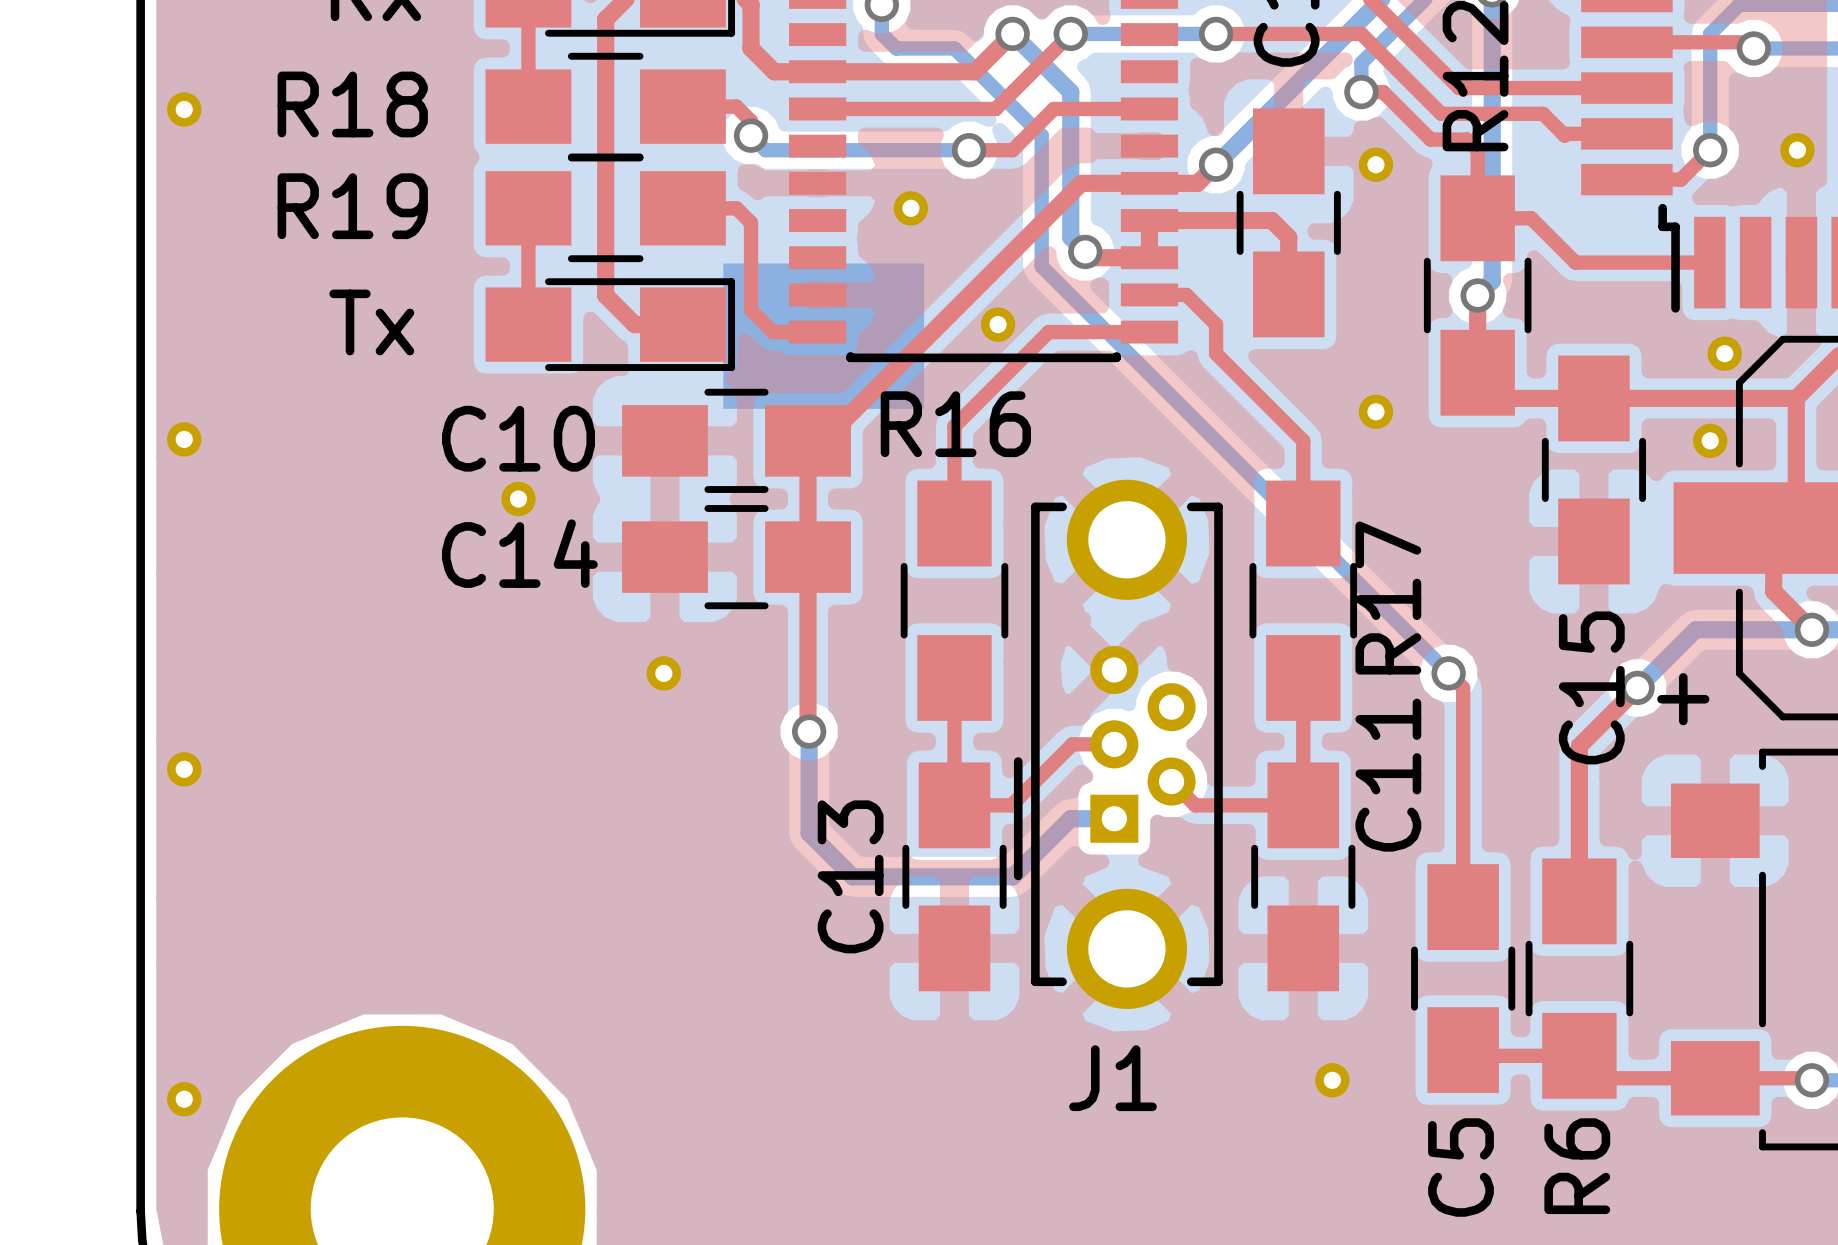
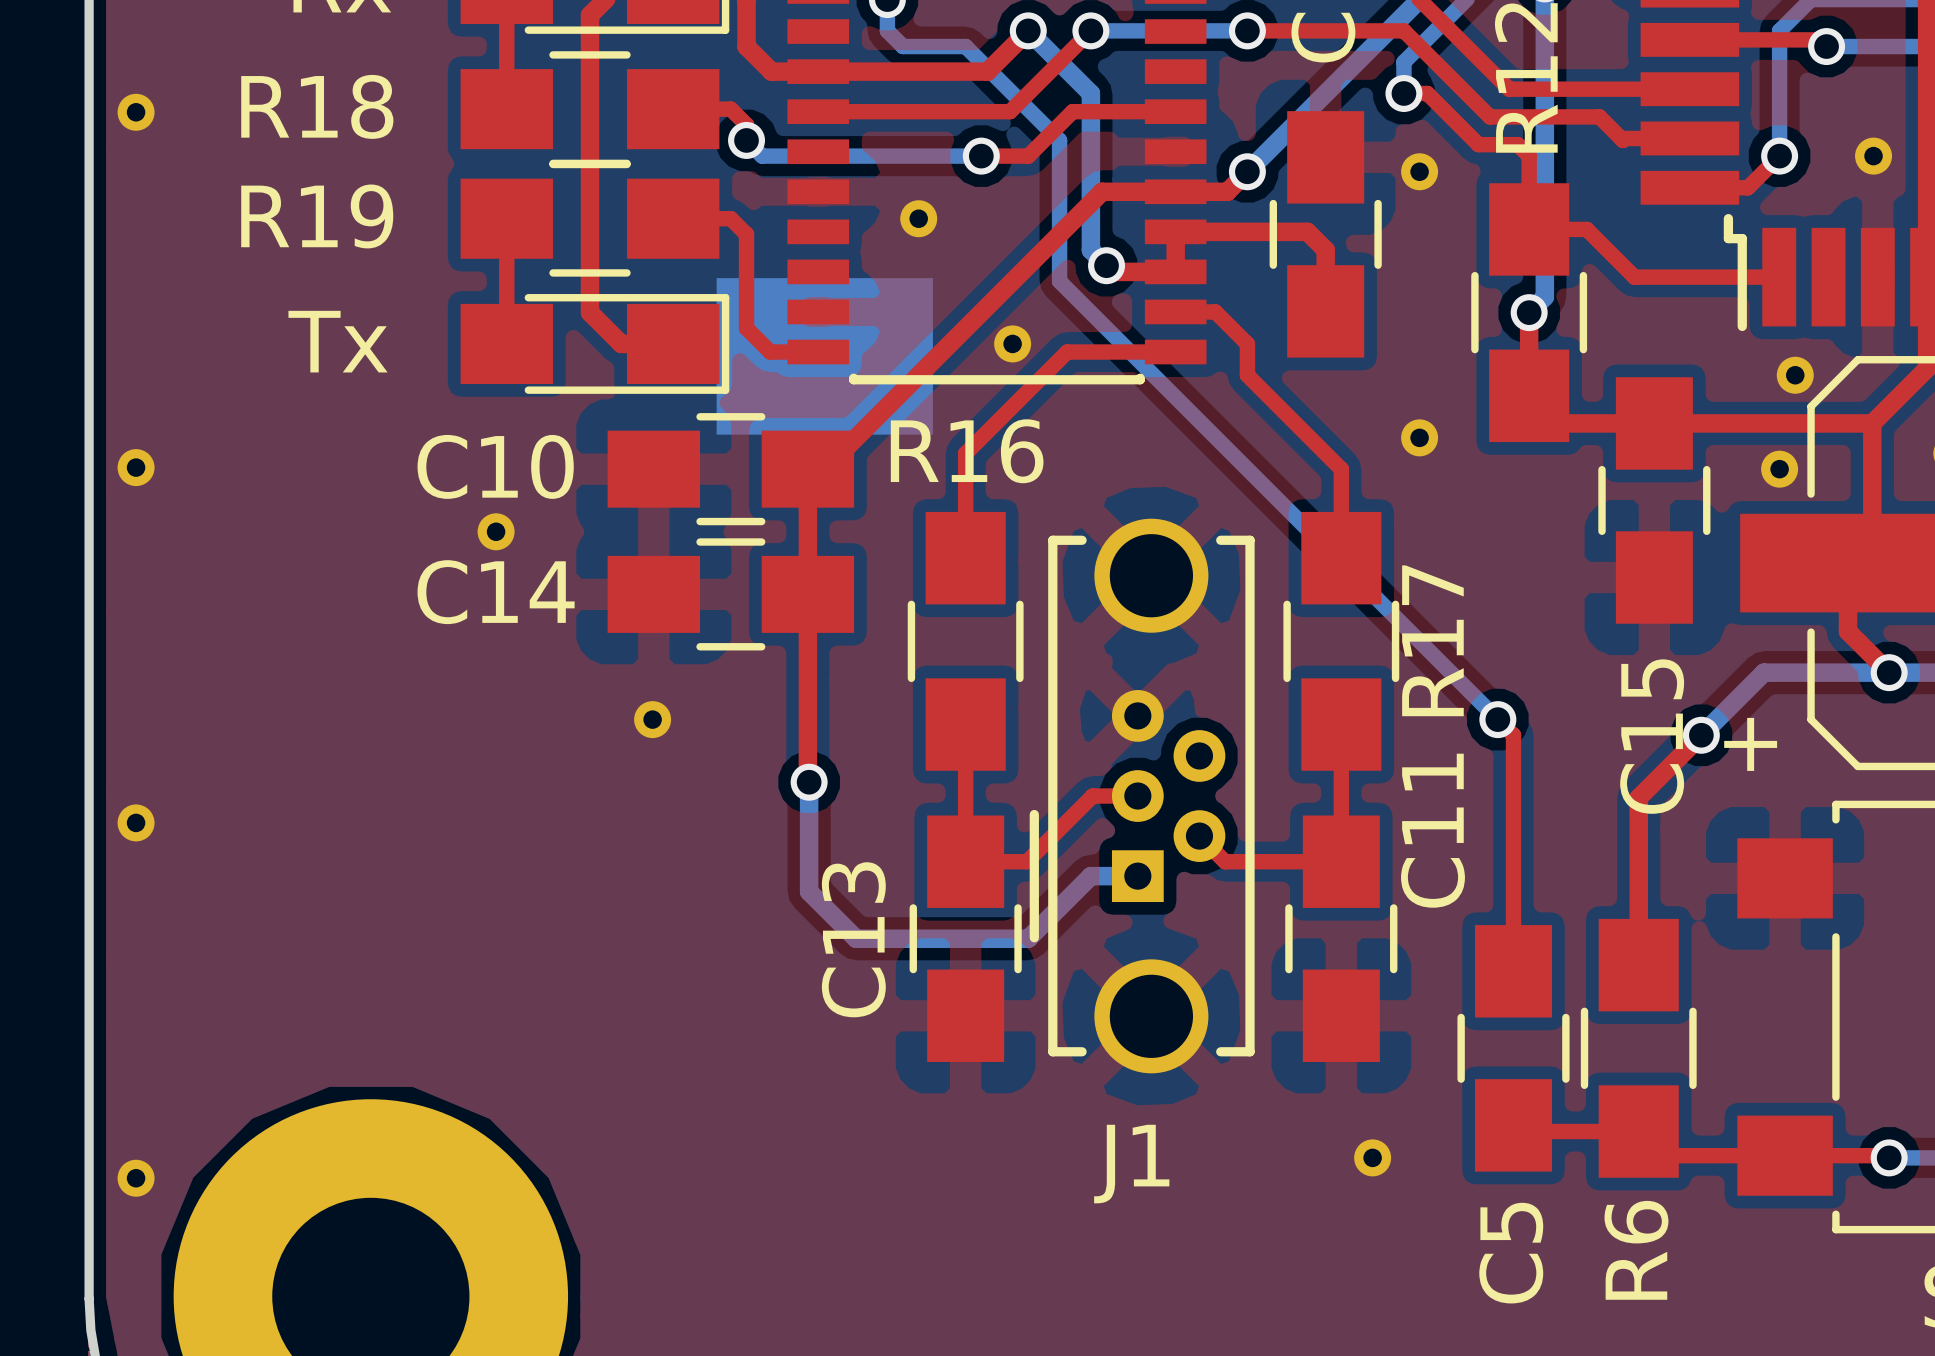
J1 footprint: [1013, 479, 1223, 1009] -> [1029, 518, 1255, 1074]

